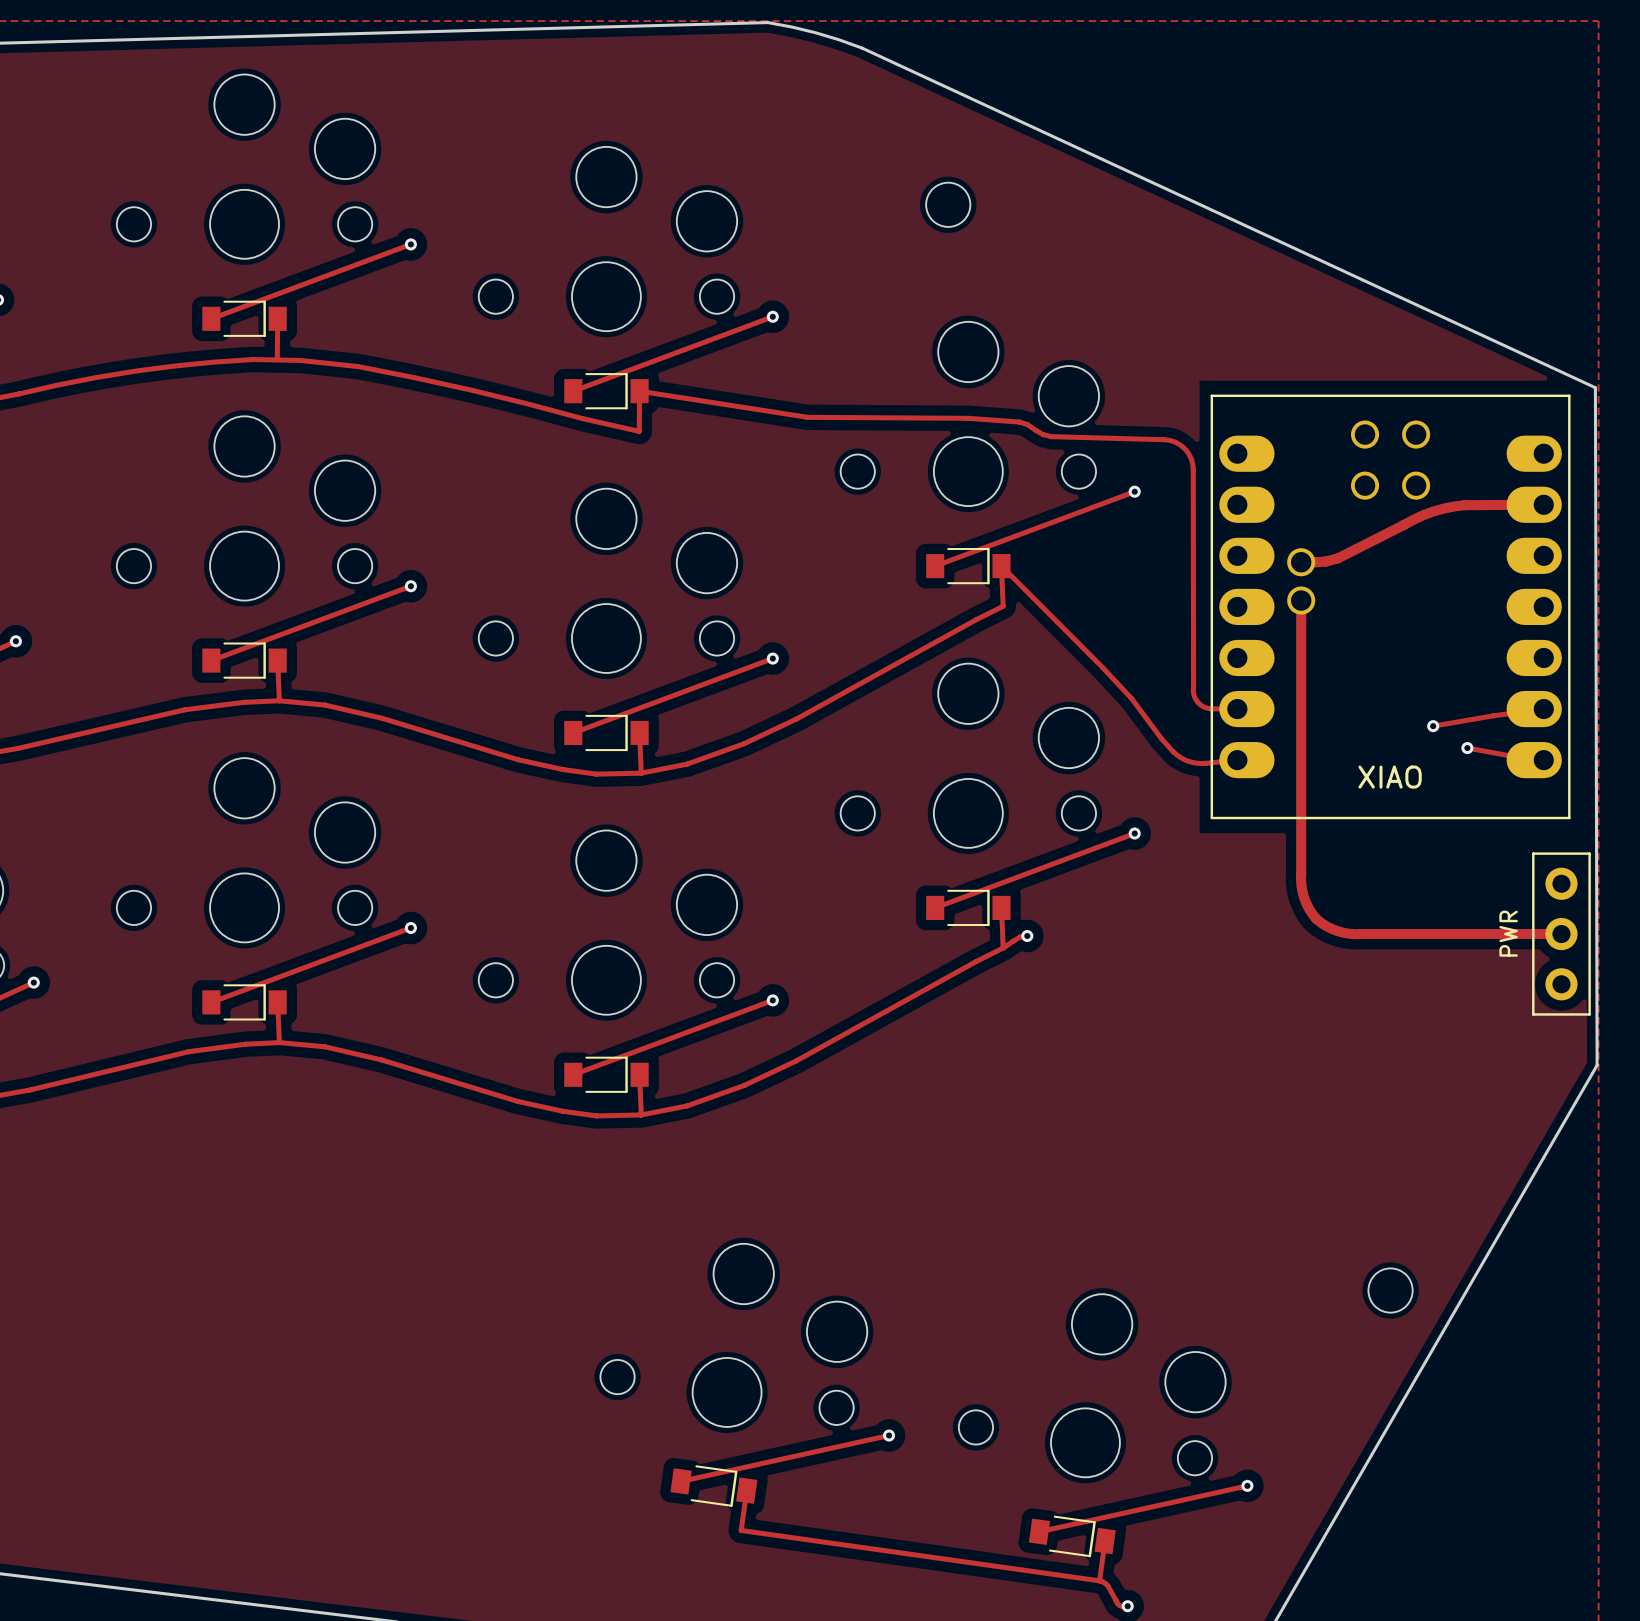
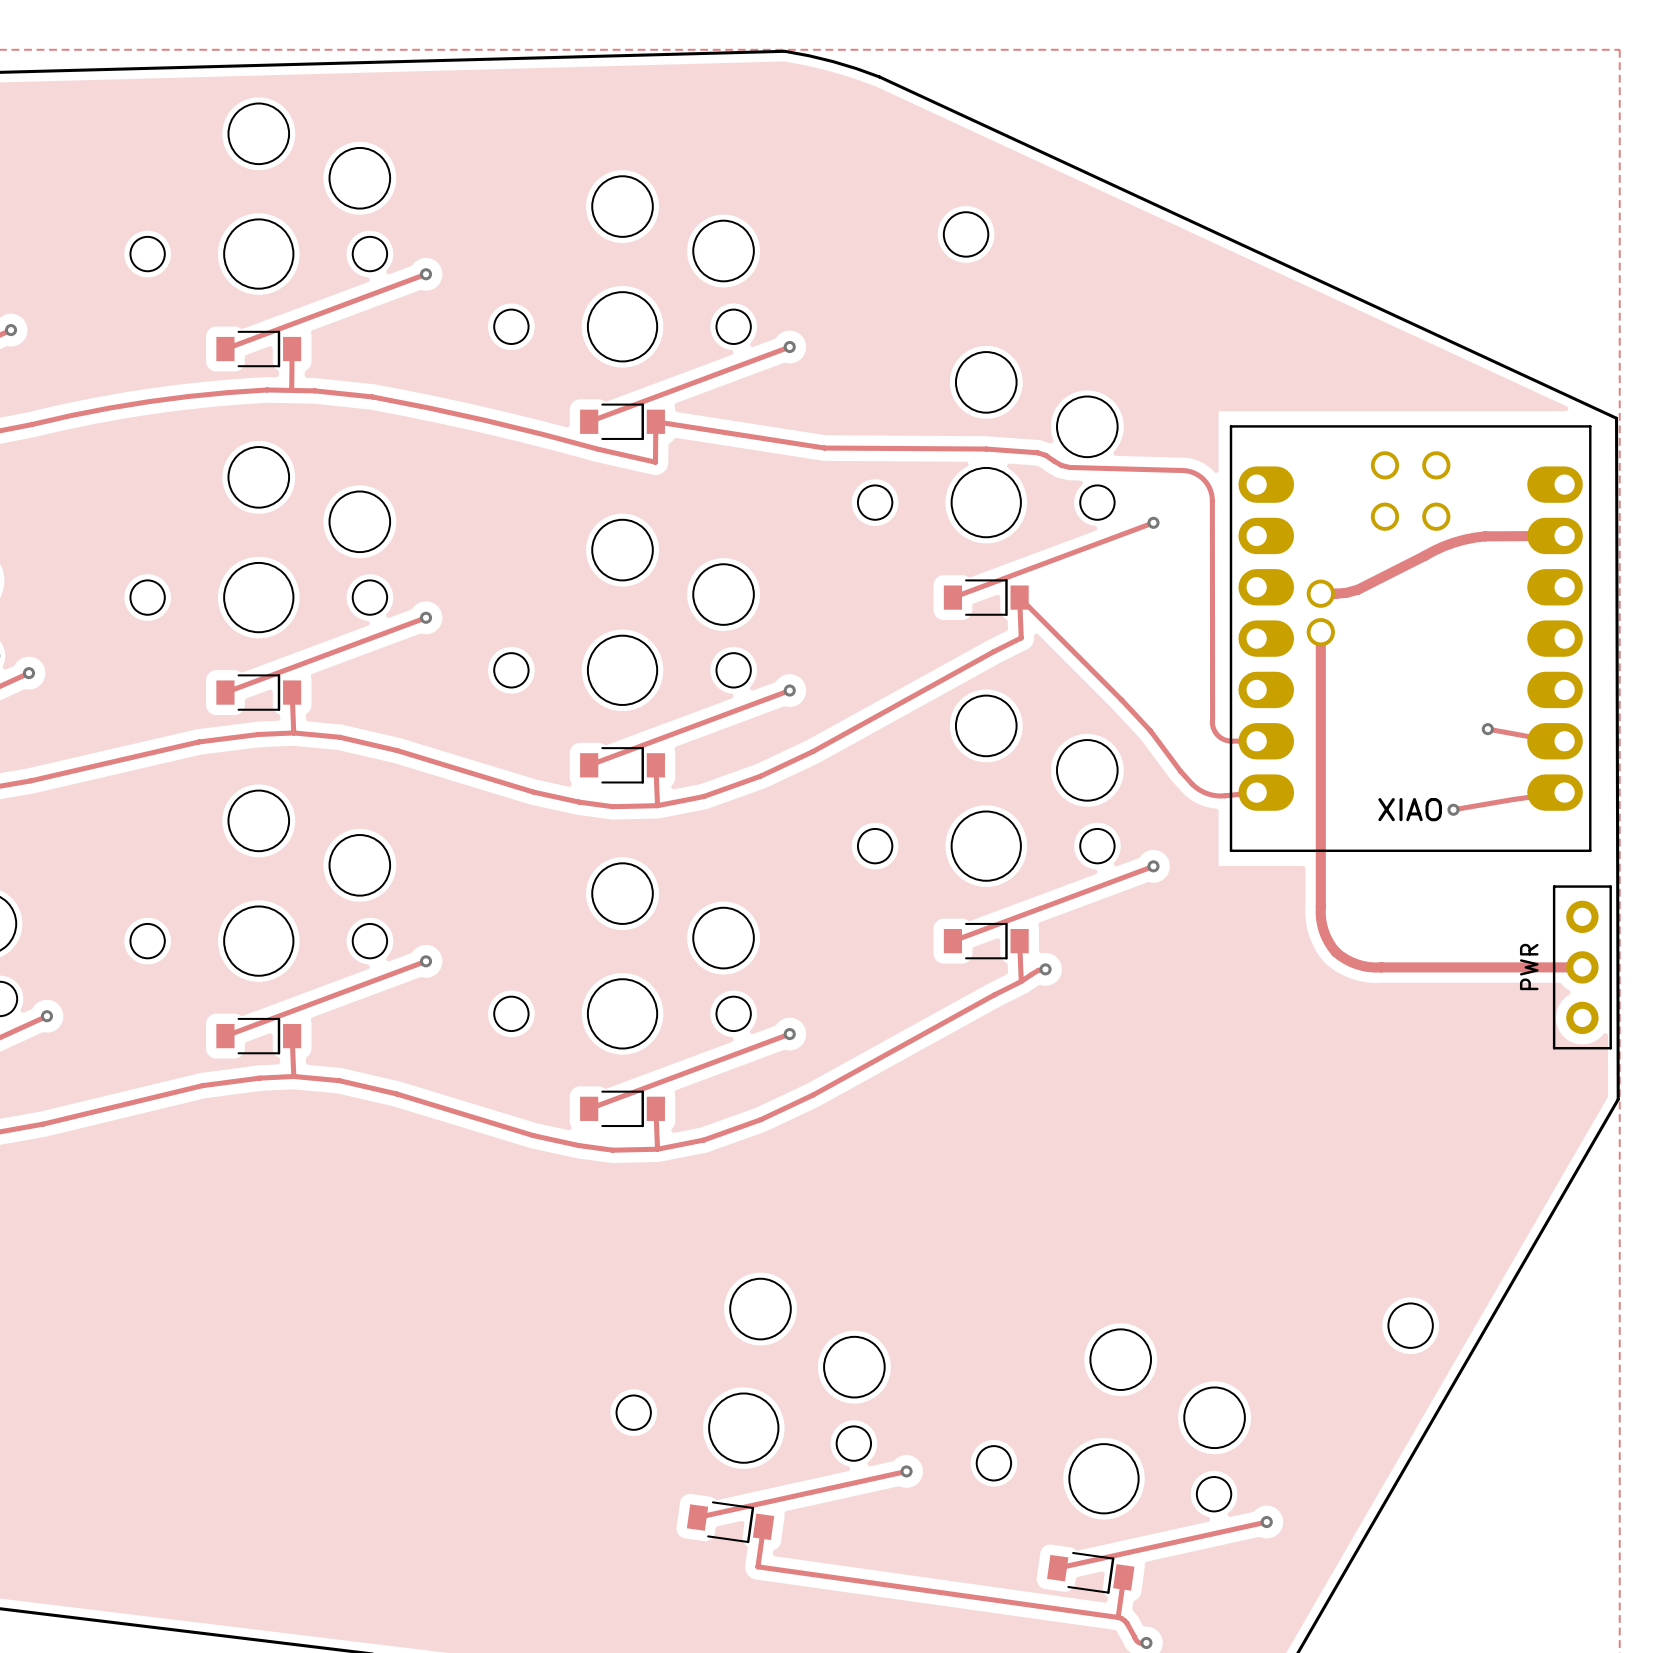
via: none -> (1487, 729)
track: (1543, 709) (1433, 726) -> (1564, 741) (1487, 729)
via: (1433, 726) -> none
track: (1467, 748) (1543, 760) -> (1453, 809) (1564, 792)
via: (1467, 748) -> none
via: none -> (1453, 809)

